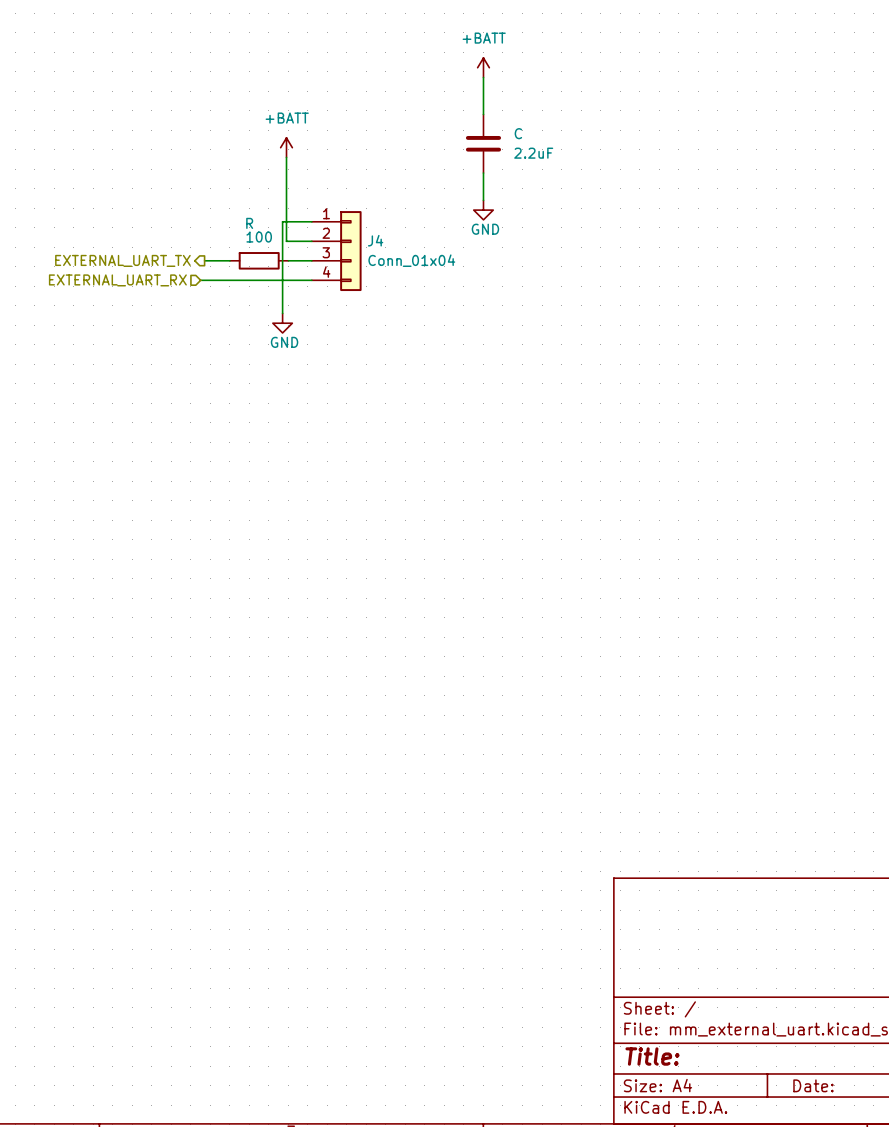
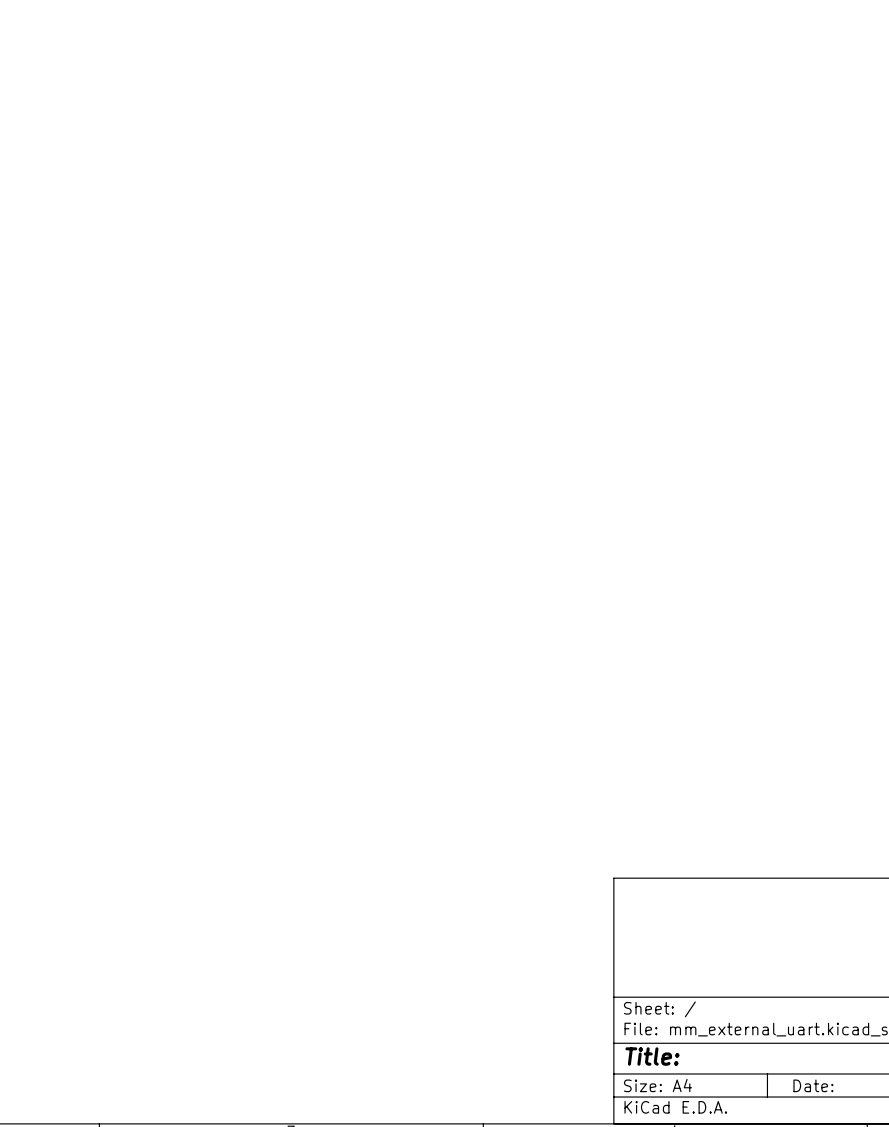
power symbol: +BATT (483, 67) -> none
wire: (483, 77) (483, 114) -> none
C: 2.2uF (483, 143) -> none
power symbol: +BATT (286, 147) -> none
wire: (286, 157) (286, 241) (311, 241) -> none
wire: (483, 173) (483, 200) -> none
power symbol: GND (483, 210) -> none
wire: (311, 221) (282, 221) (282, 313) -> none
J4: Conn_01x04 (336, 251) -> none
hierarchical label: EXTERNAL_UART_TX (122, 260) -> none
wire: (204, 260) (229, 260) -> none
R: 100 (259, 260) -> none
wire: (288, 260) (311, 260) -> none
hierarchical label: EXTERNAL_UART_RX (117, 280) -> none
wire: (200, 280) (311, 280) -> none
power symbol: GND (282, 323) -> none

